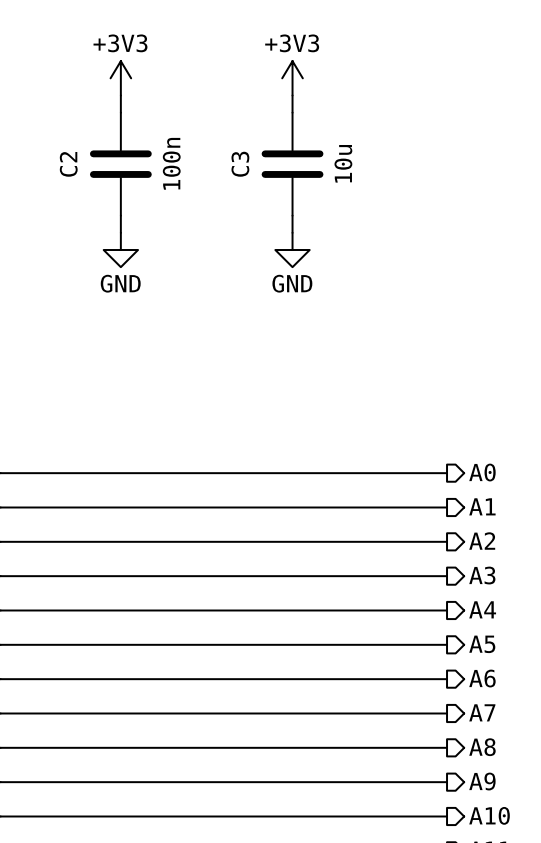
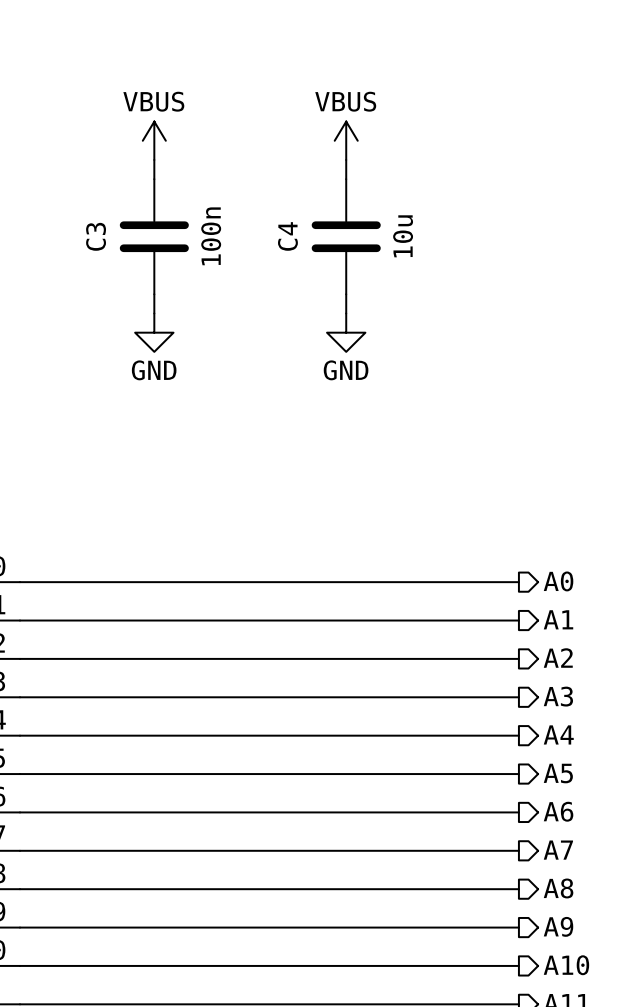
power symbol: +3V3 (120, 78) -> VBUS (154, 140)
power symbol: +3V3 (292, 78) -> VBUS (346, 140)
C2 name: C2 (68, 164) -> C3 (96, 236)
C3 name: C3 (240, 164) -> C4 (287, 236)

